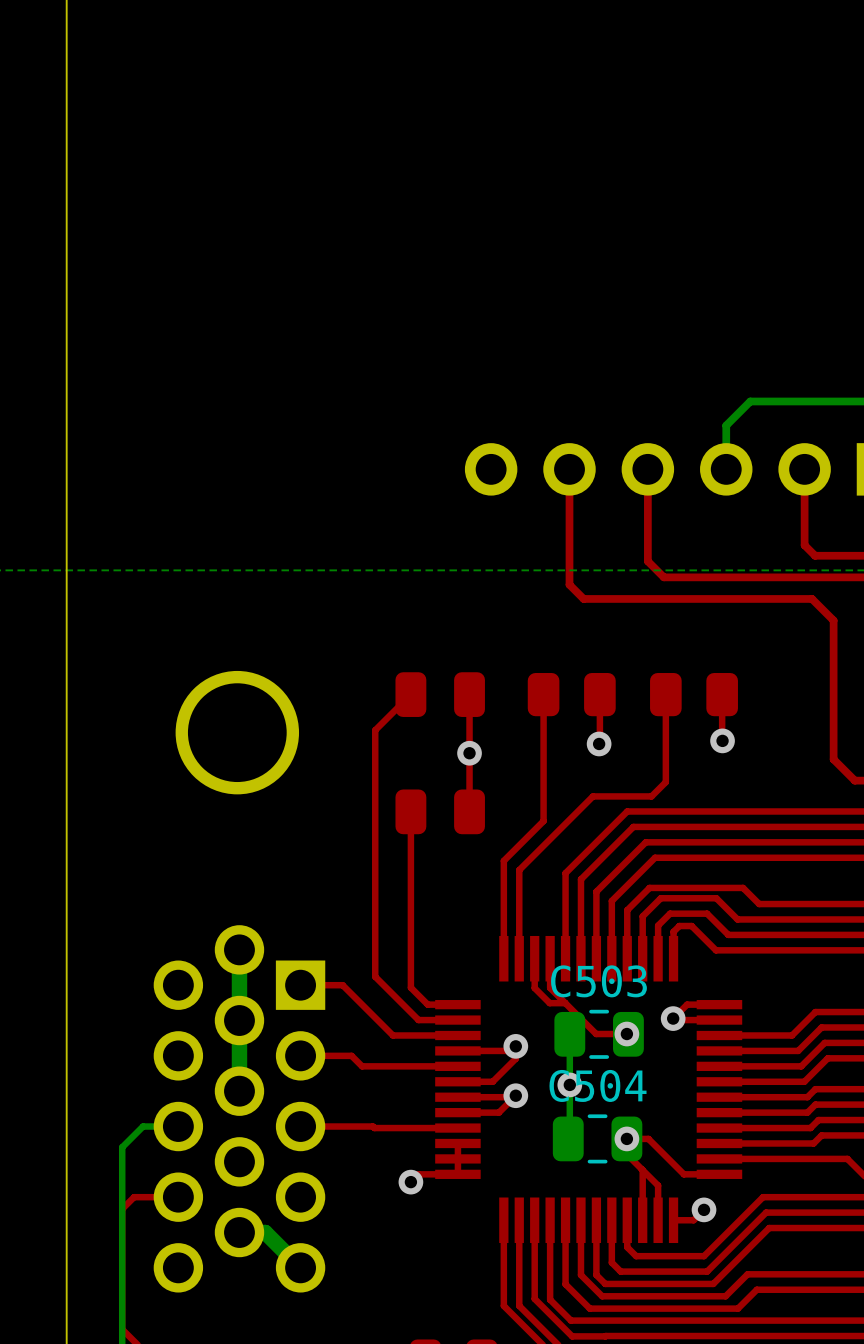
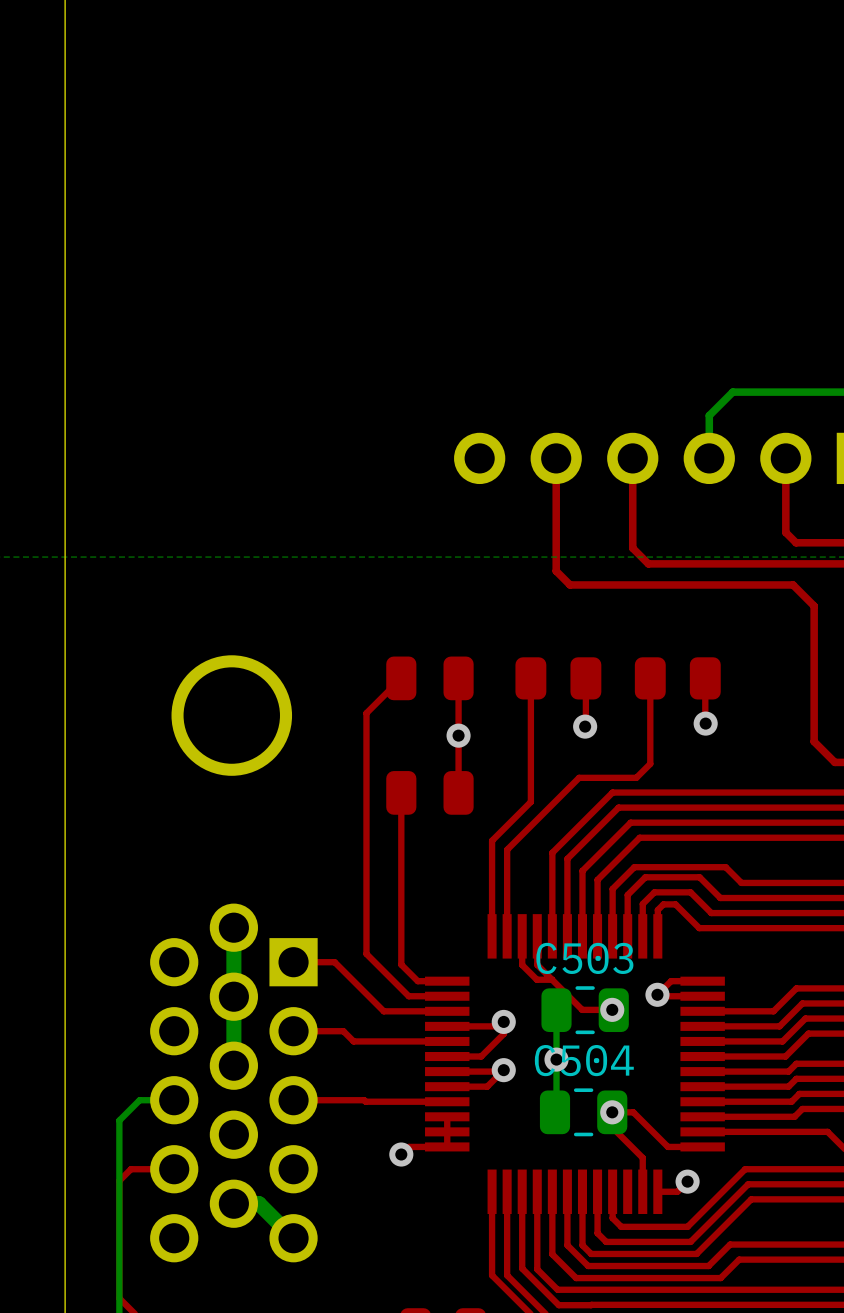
top track: (642, 1170) (642, 1220) -> none

